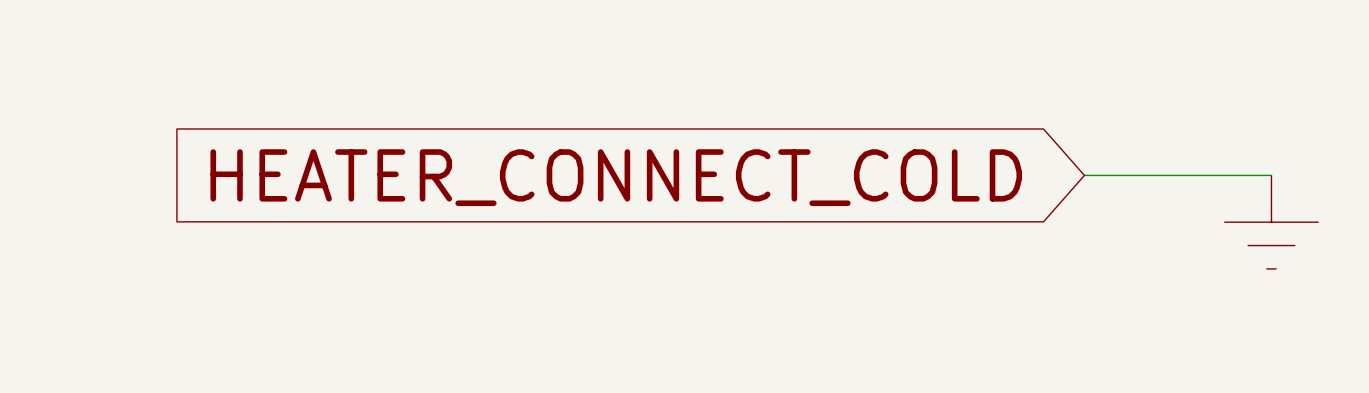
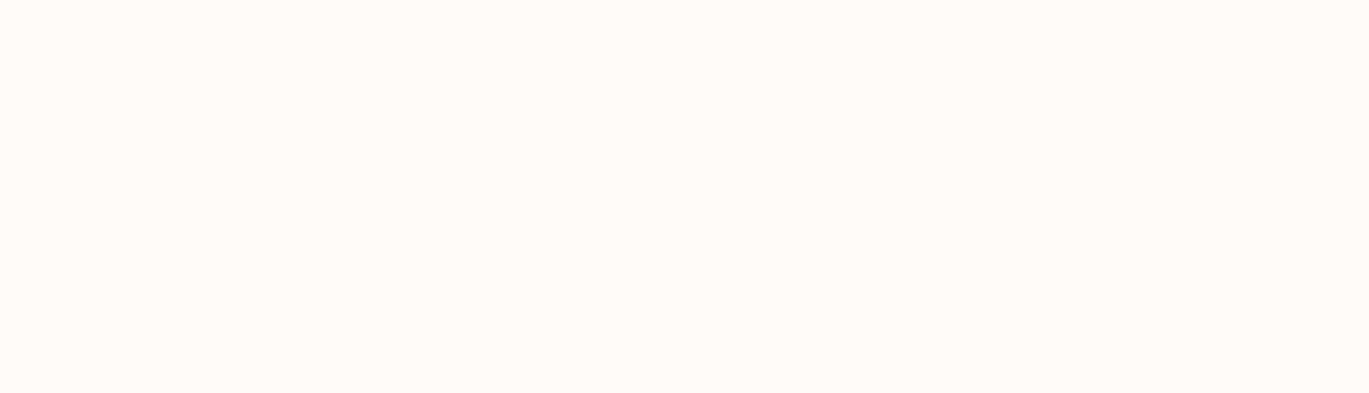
wire: (1084, 175) (1271, 175) -> none
global label: HEATER_CONNECT_COLD (616, 177) -> none
power symbol: (1271, 222) -> none

